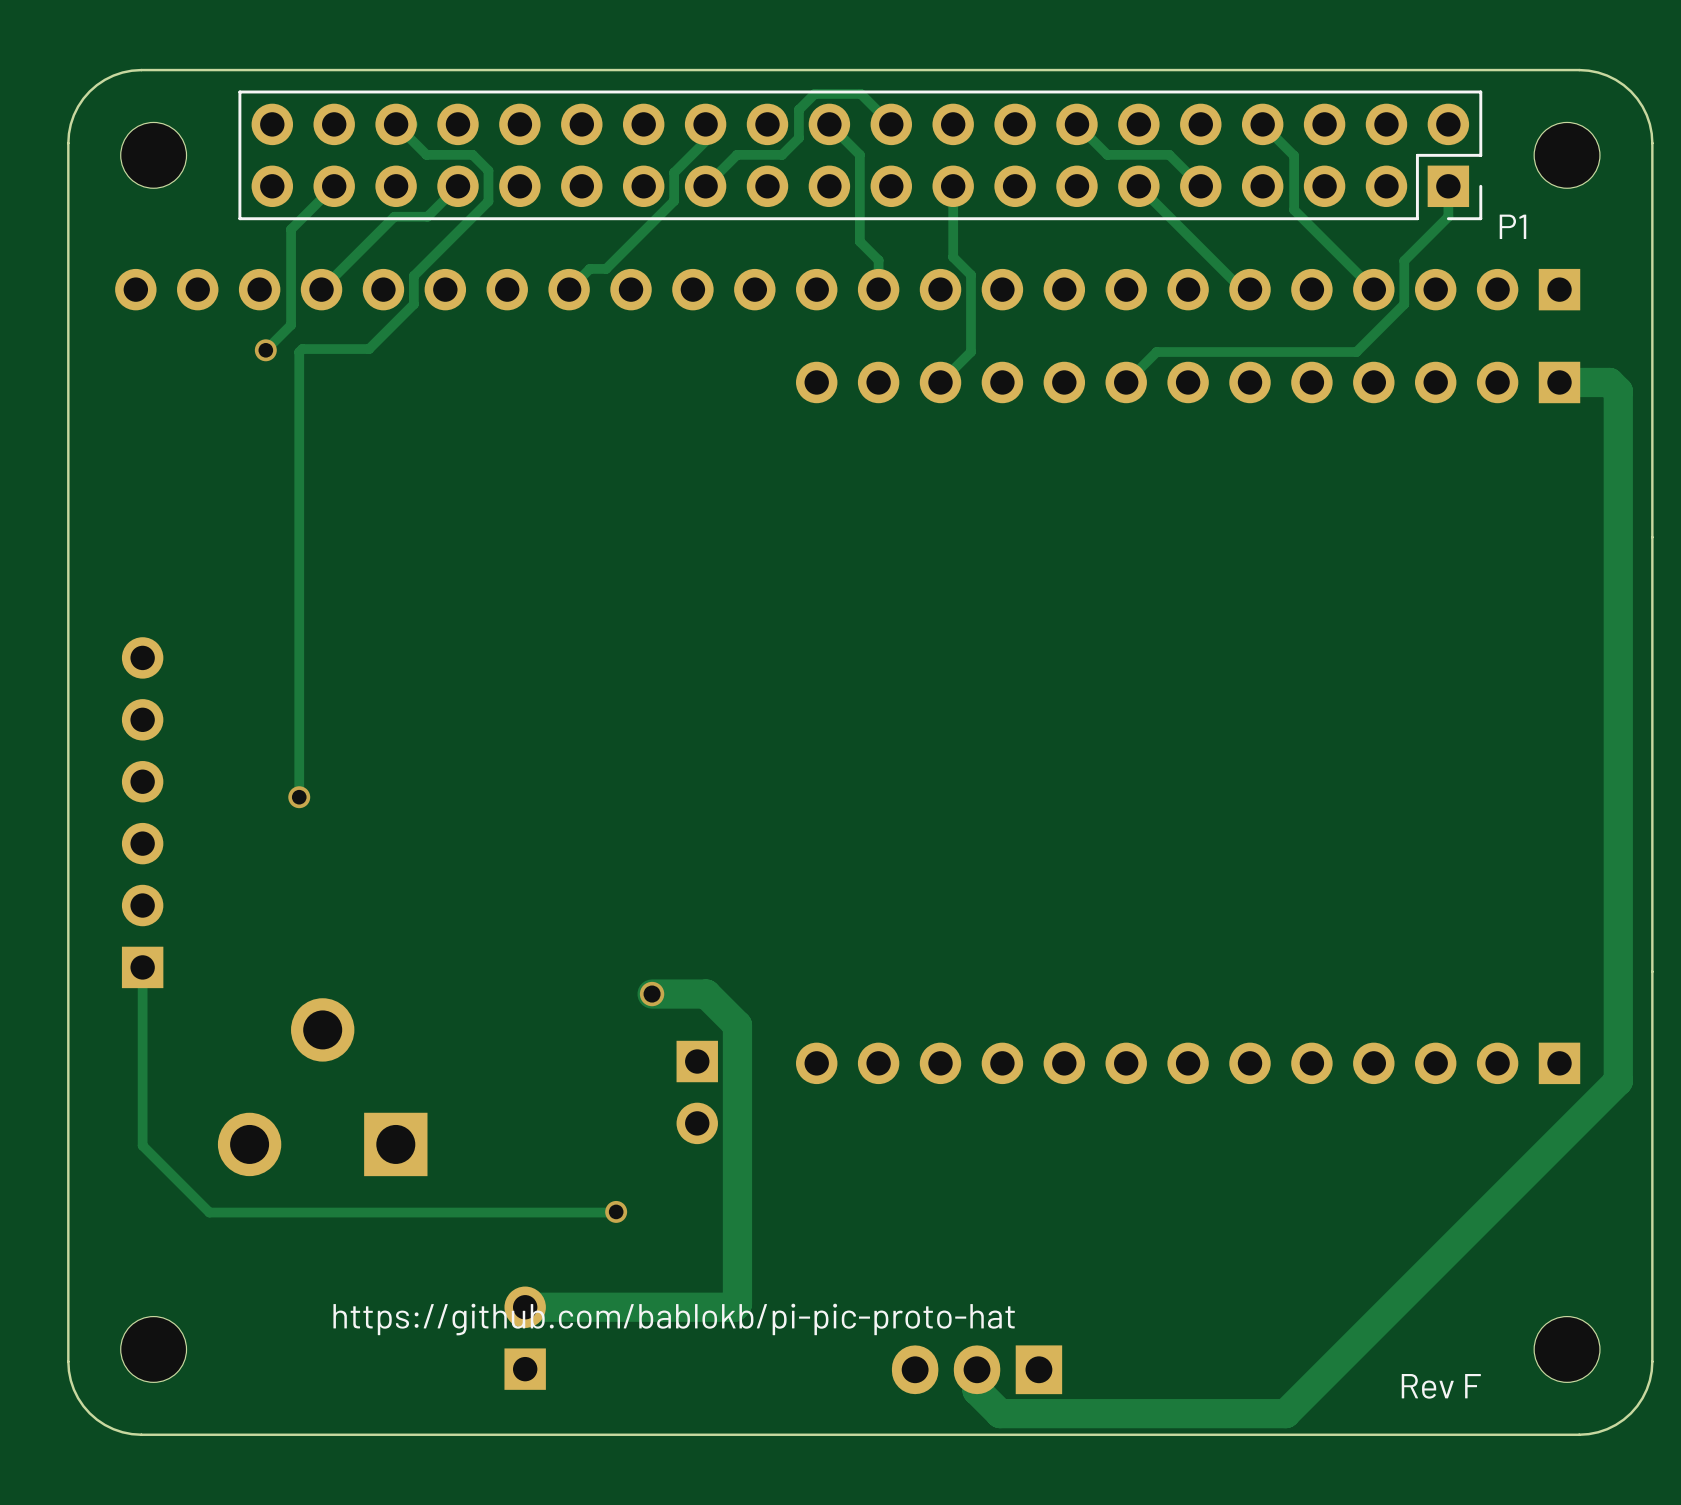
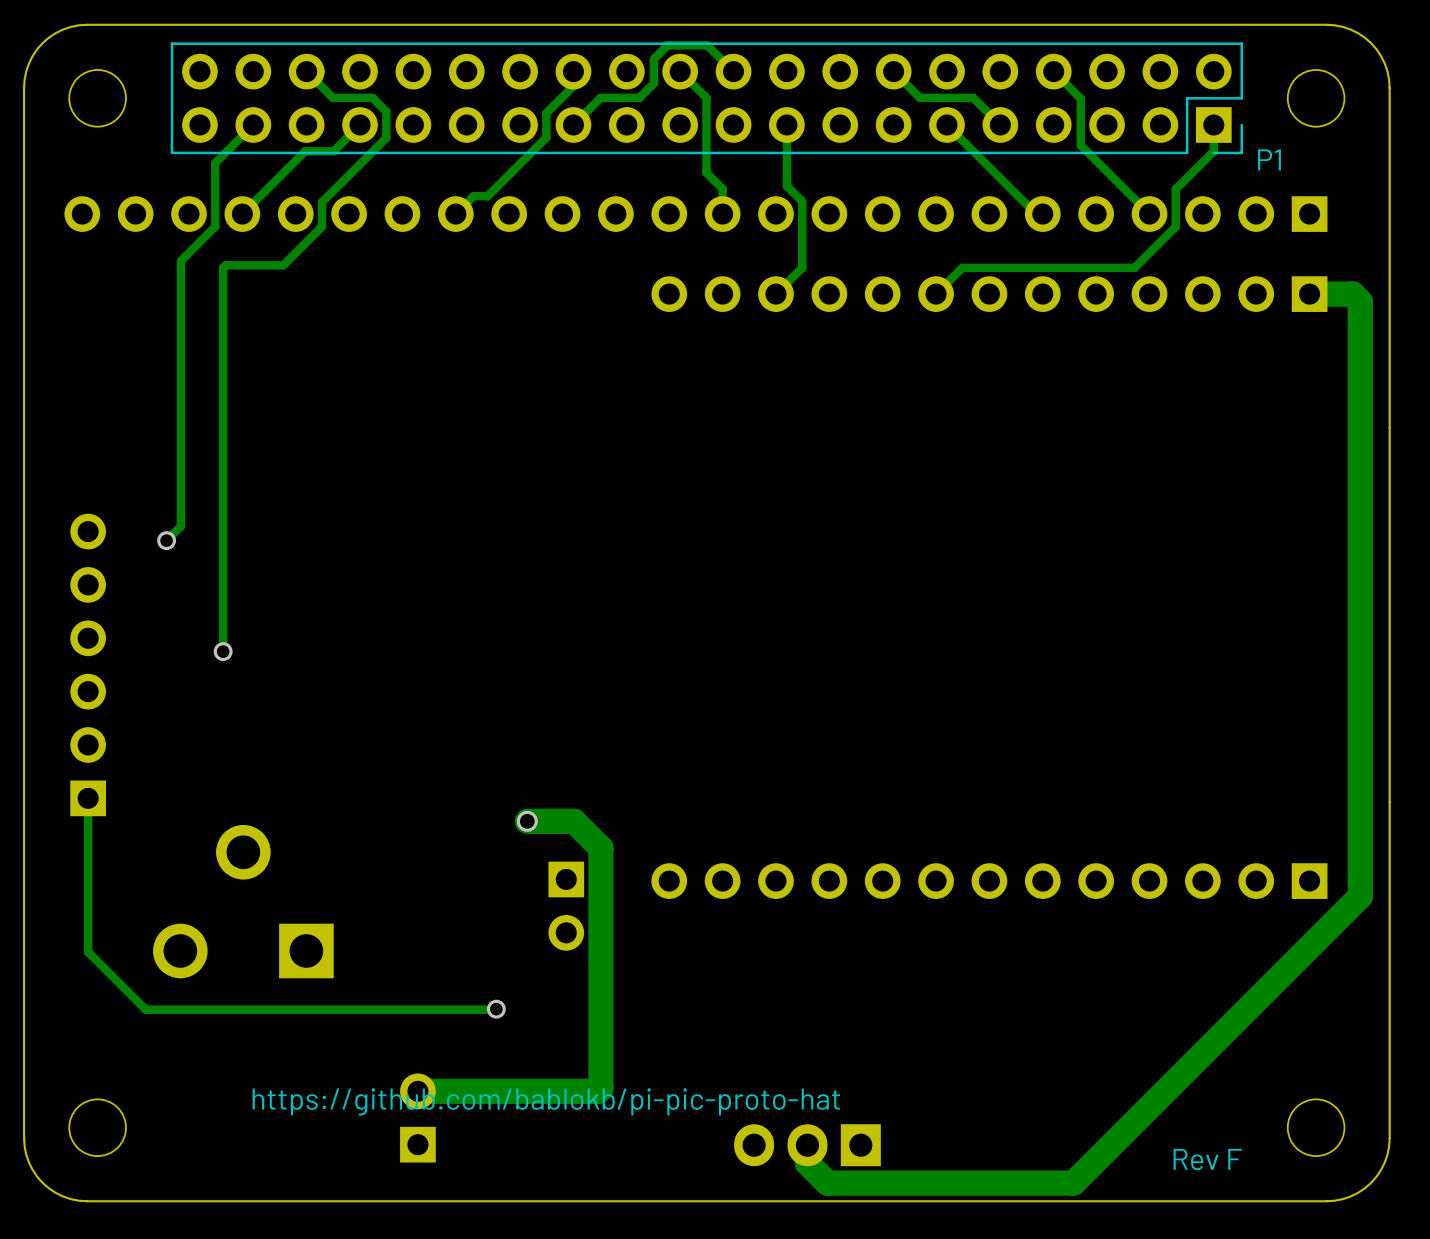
track: (291, 229) (291, 325) (265, 350) -> (216, 162) (215, 226) (180, 261) (180, 526) (166, 540)
via: (265, 350) -> none
via: none -> (166, 540)

